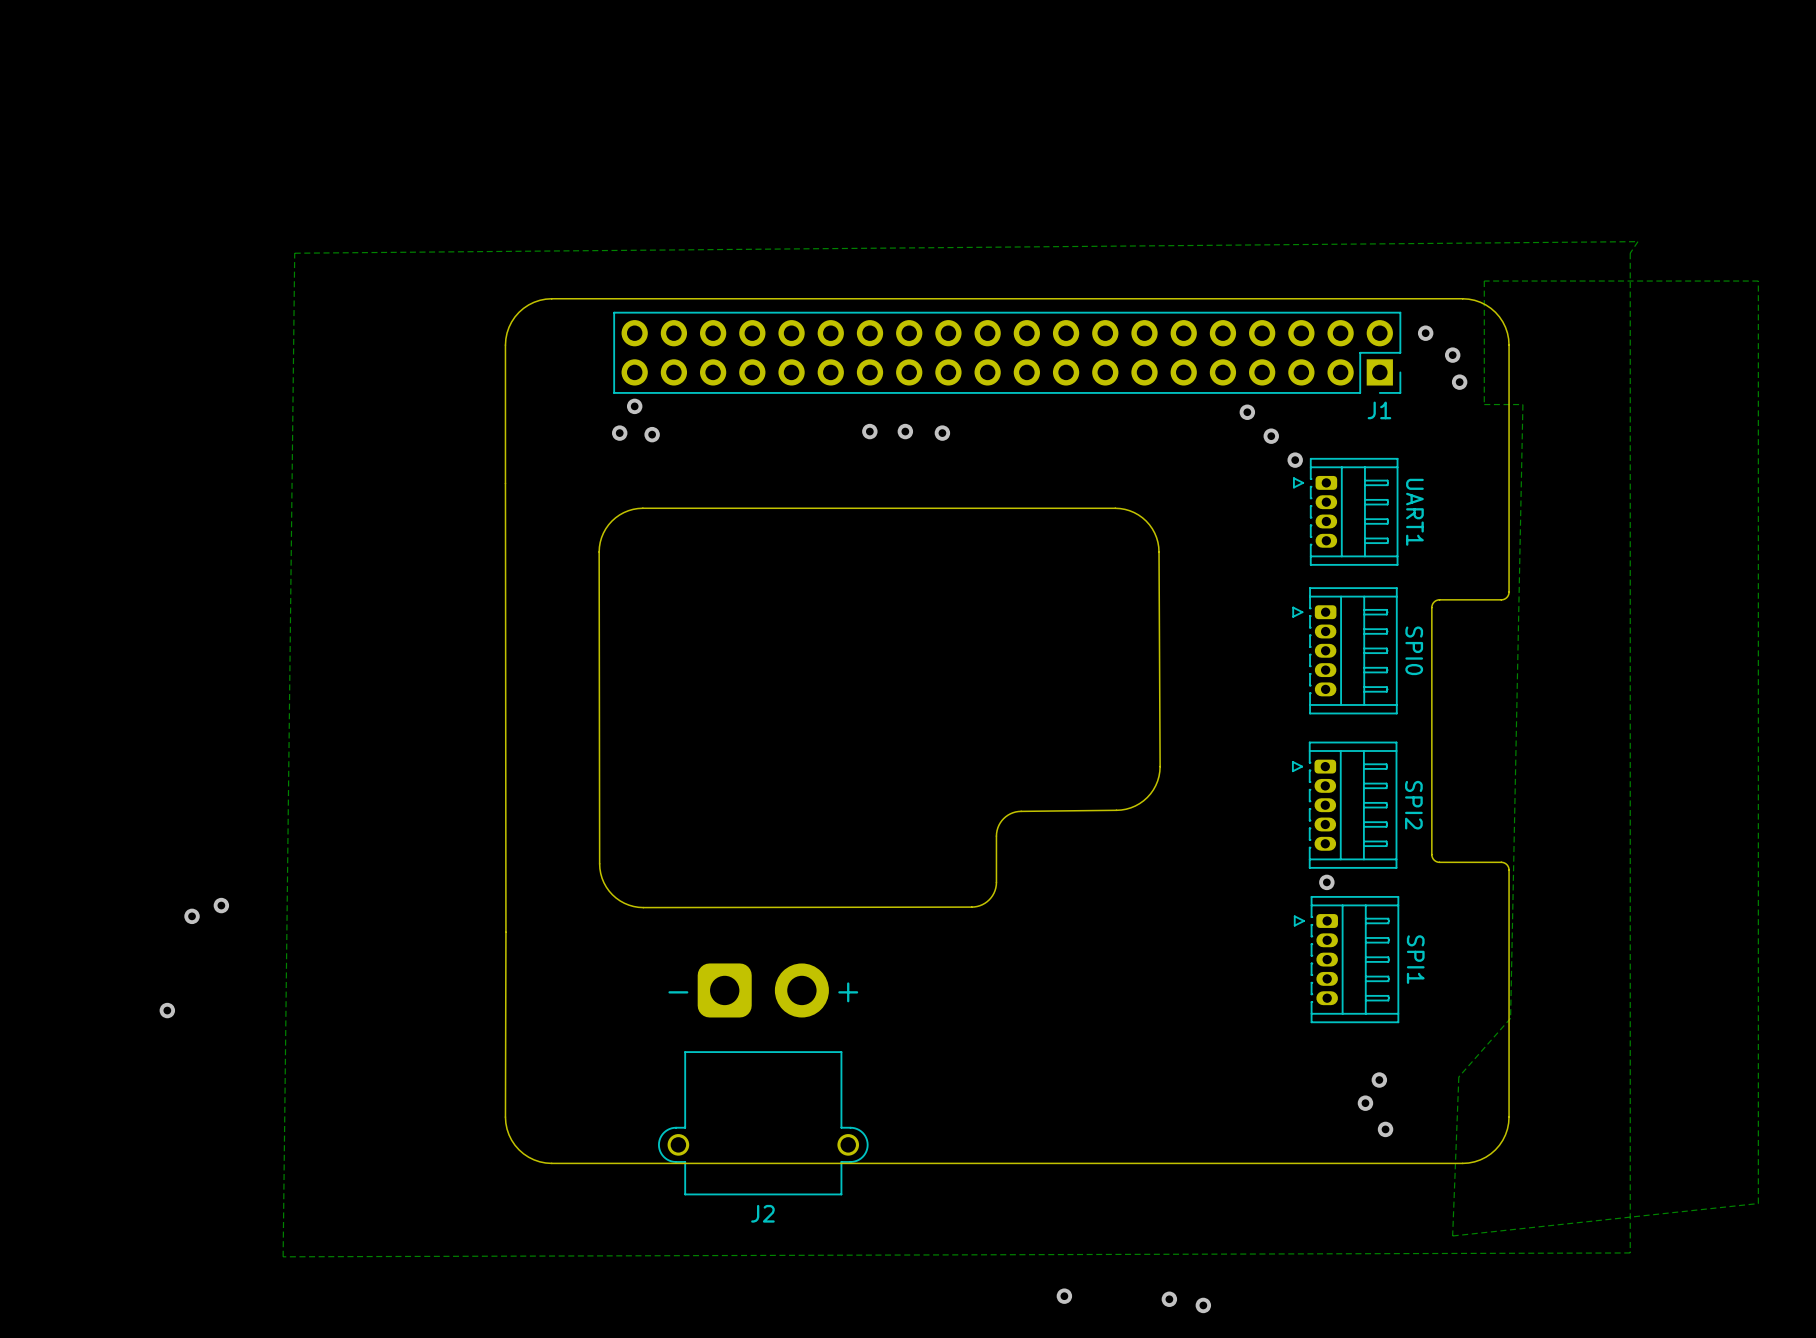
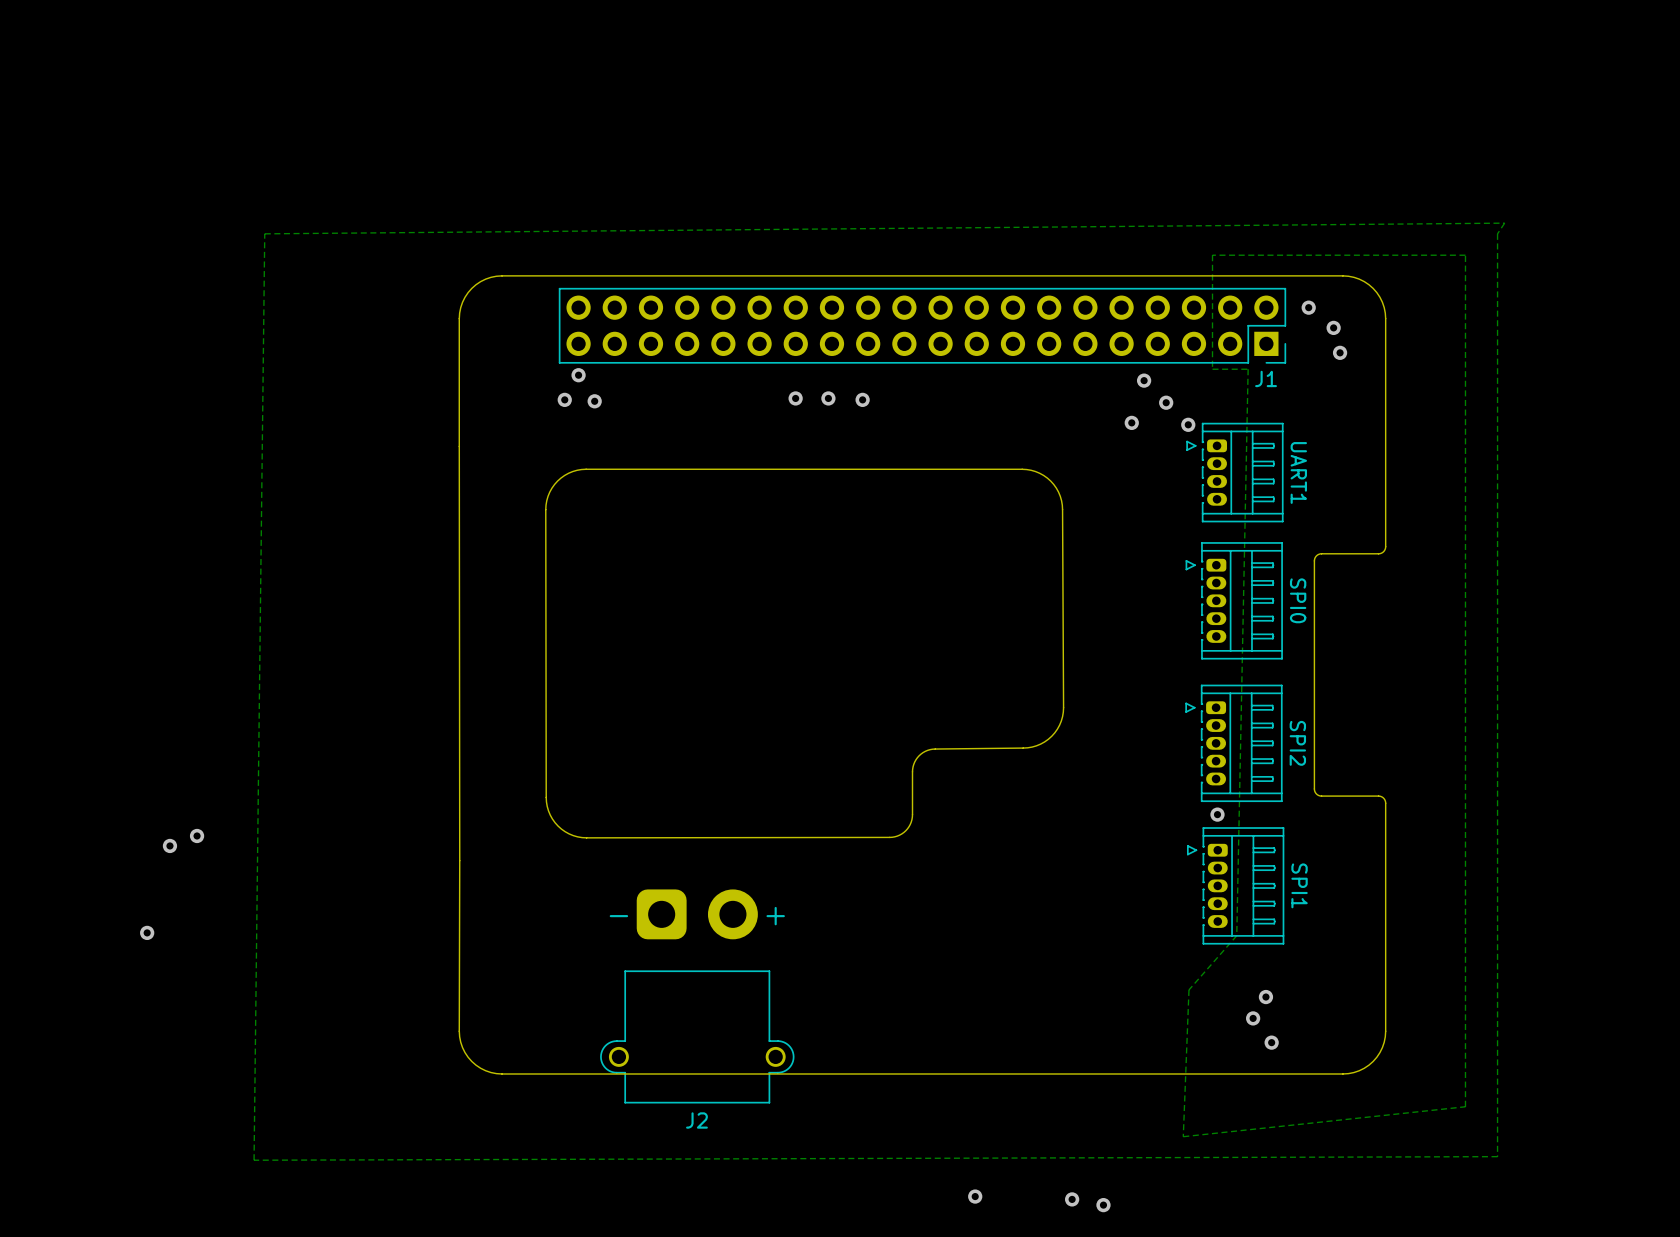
zone outline: (1758, 281) (1758, 1203) (1452, 1235) (1458, 1076) (1510, 1018) (1522, 404) (1484, 404) (1484, 281) (1758, 281) -> (1465, 255) (1465, 1106) (1183, 1136) (1188, 989) (1236, 935) (1248, 369) (1212, 369) (1212, 255) (1465, 255)
via: none -> (1131, 422)

